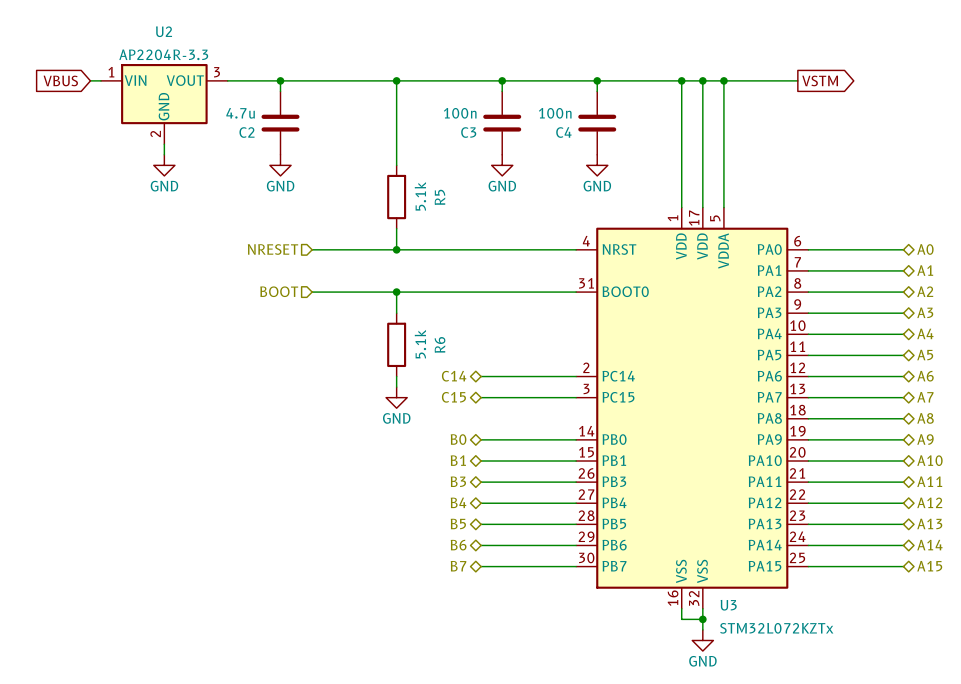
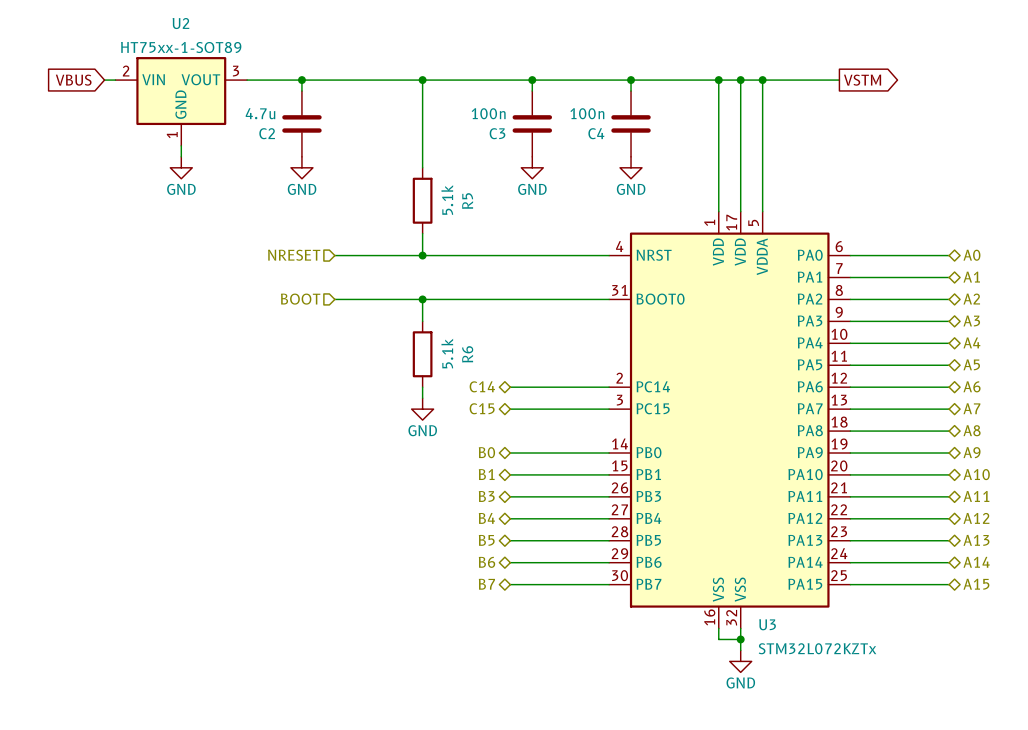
U2 value: AP2204R-3.3 (163, 54) -> HT75xx-1-SOT89 (181, 47)
U2 symbol: [101, 64, 228, 145] -> [115, 57, 248, 146]

